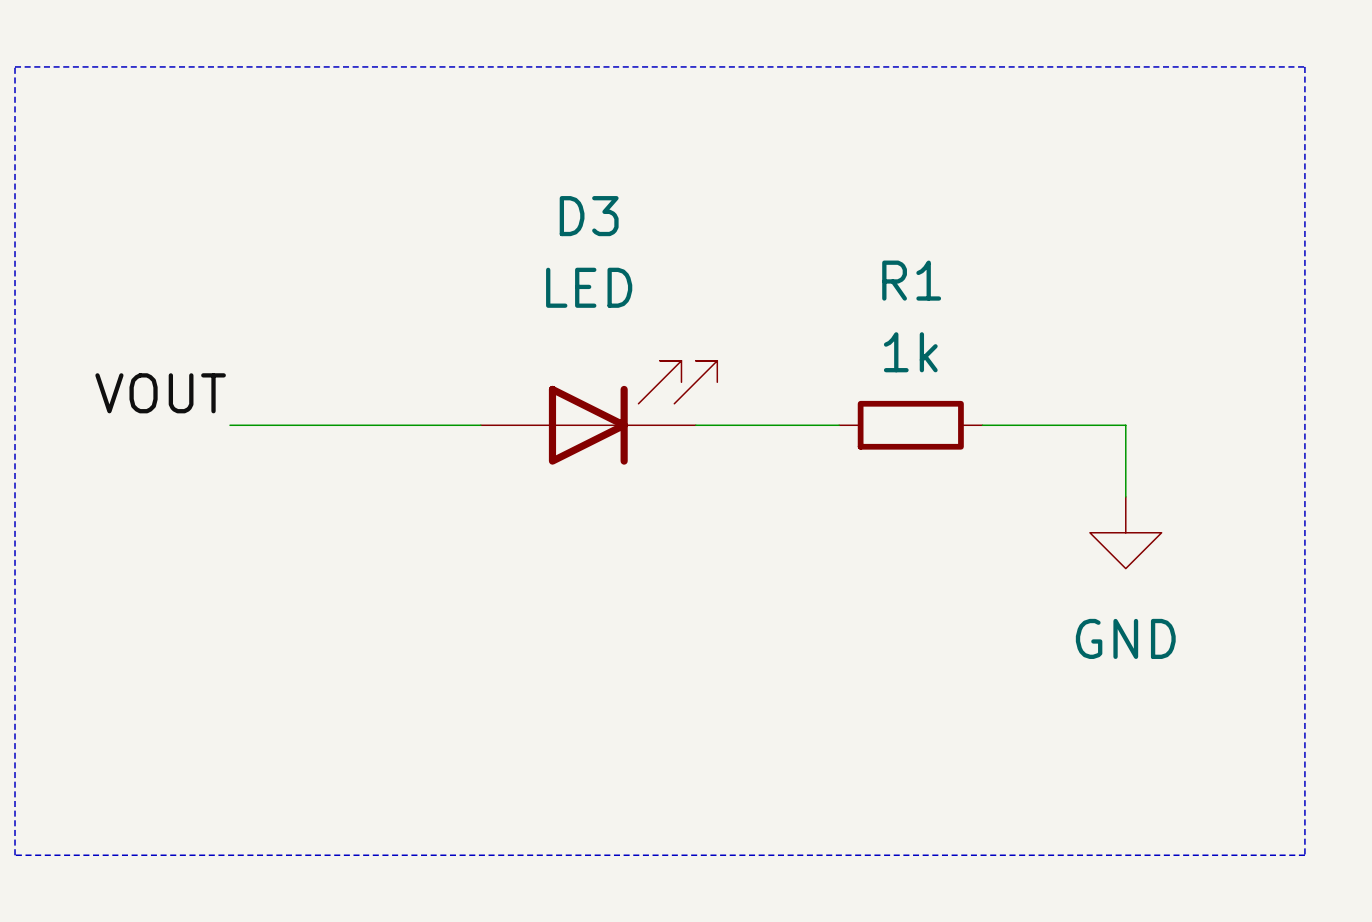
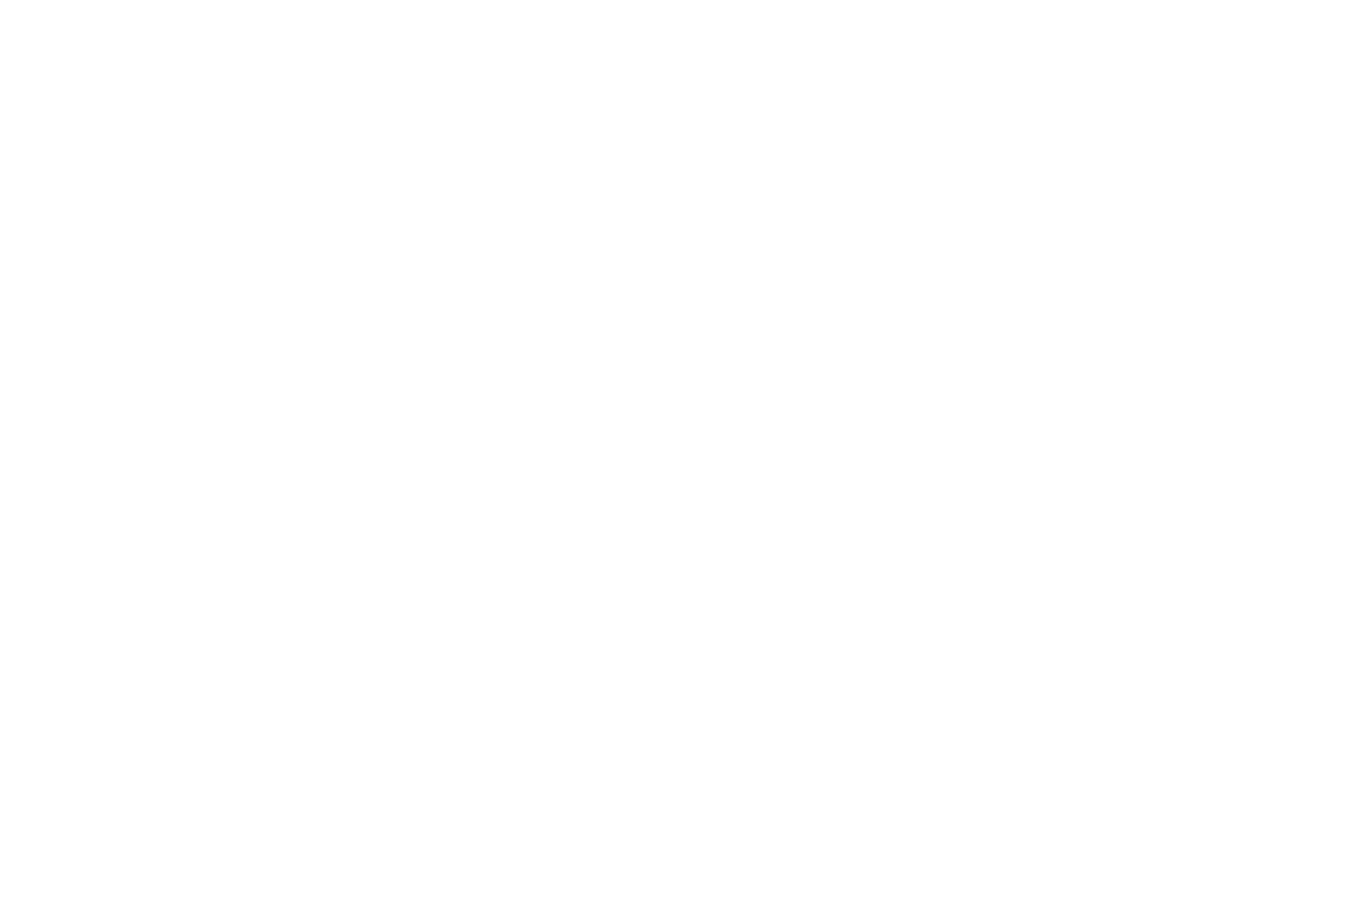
line: (15, 66) (1304, 66) (1304, 855) (15, 855) (15, 66) -> none
label: VOUT (160, 393) -> none
D3: LED (599, 412) -> none
wire: (229, 425) (480, 425) -> none
wire: (695, 425) (839, 425) -> none
R1: 1k (910, 425) -> none
wire: (982, 425) (1125, 425) (1125, 496) -> none
power symbol: GND (1125, 532) -> none

